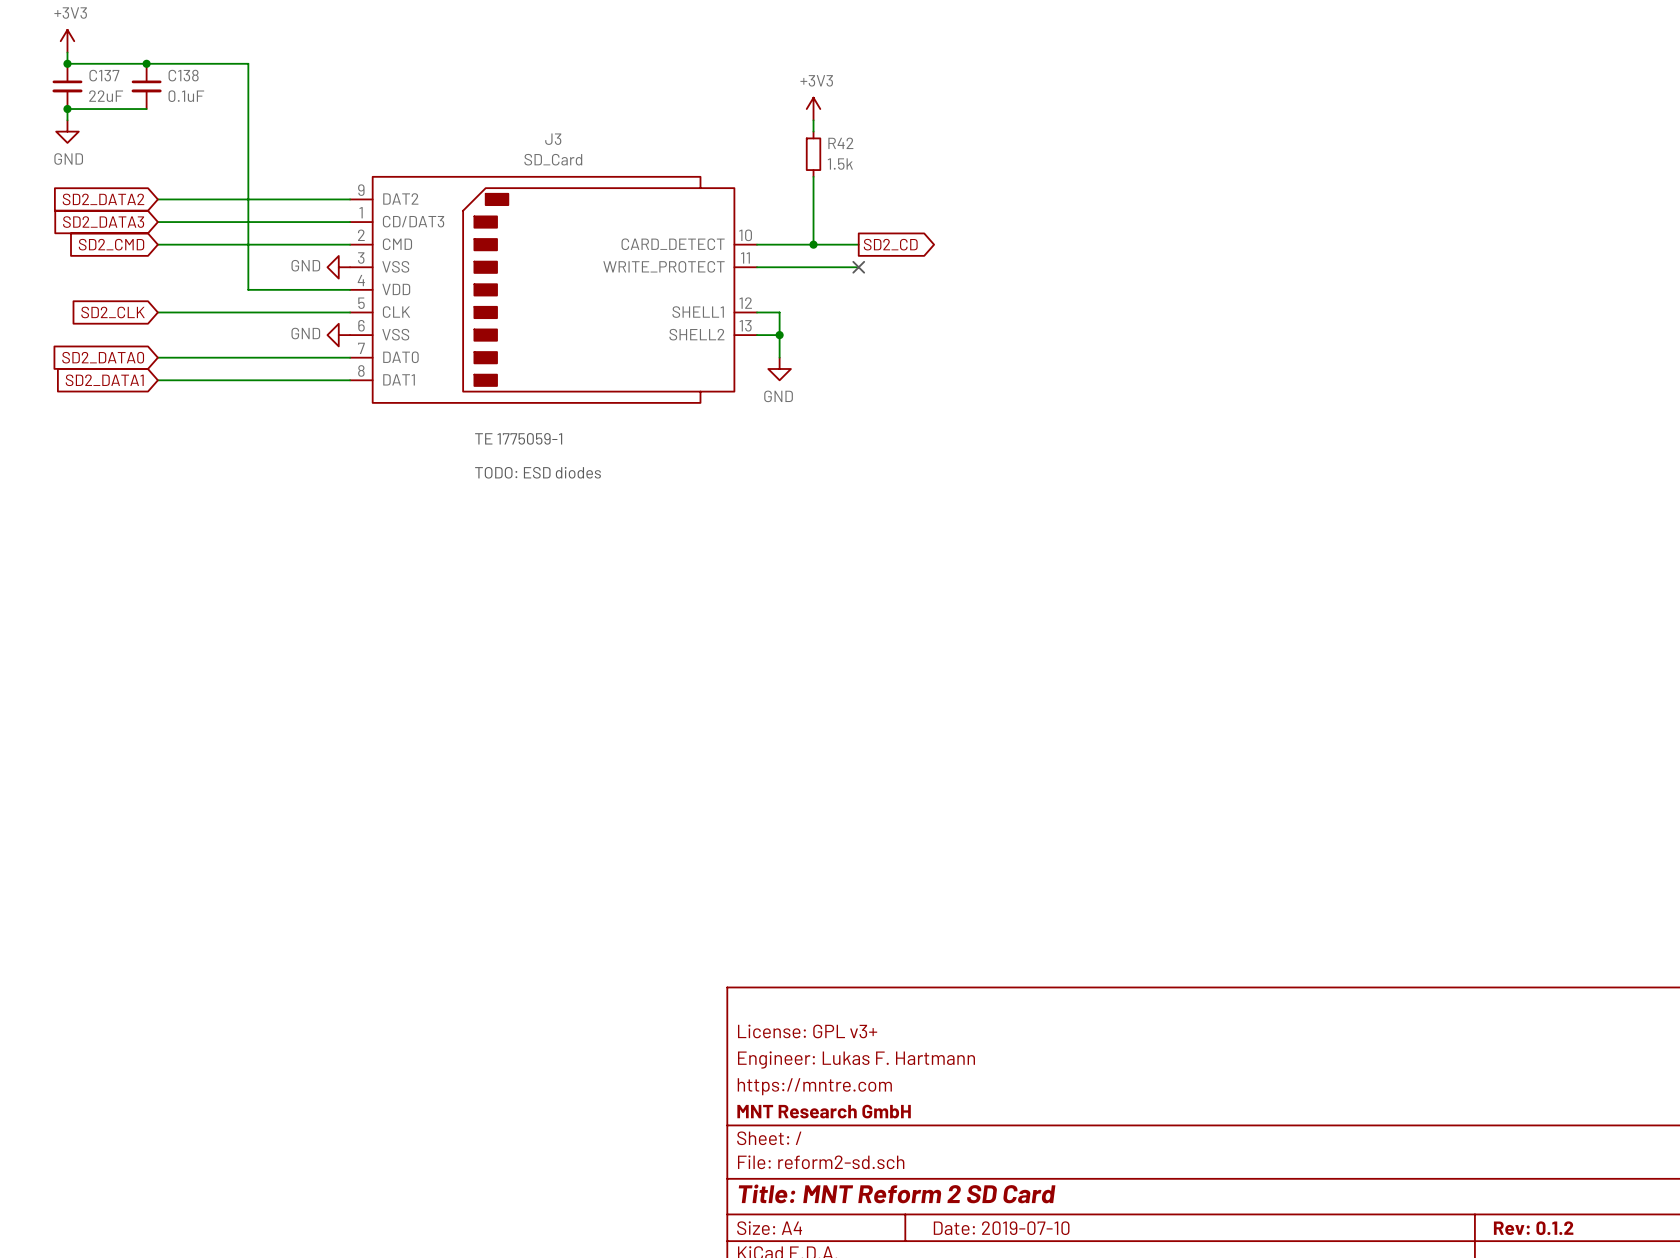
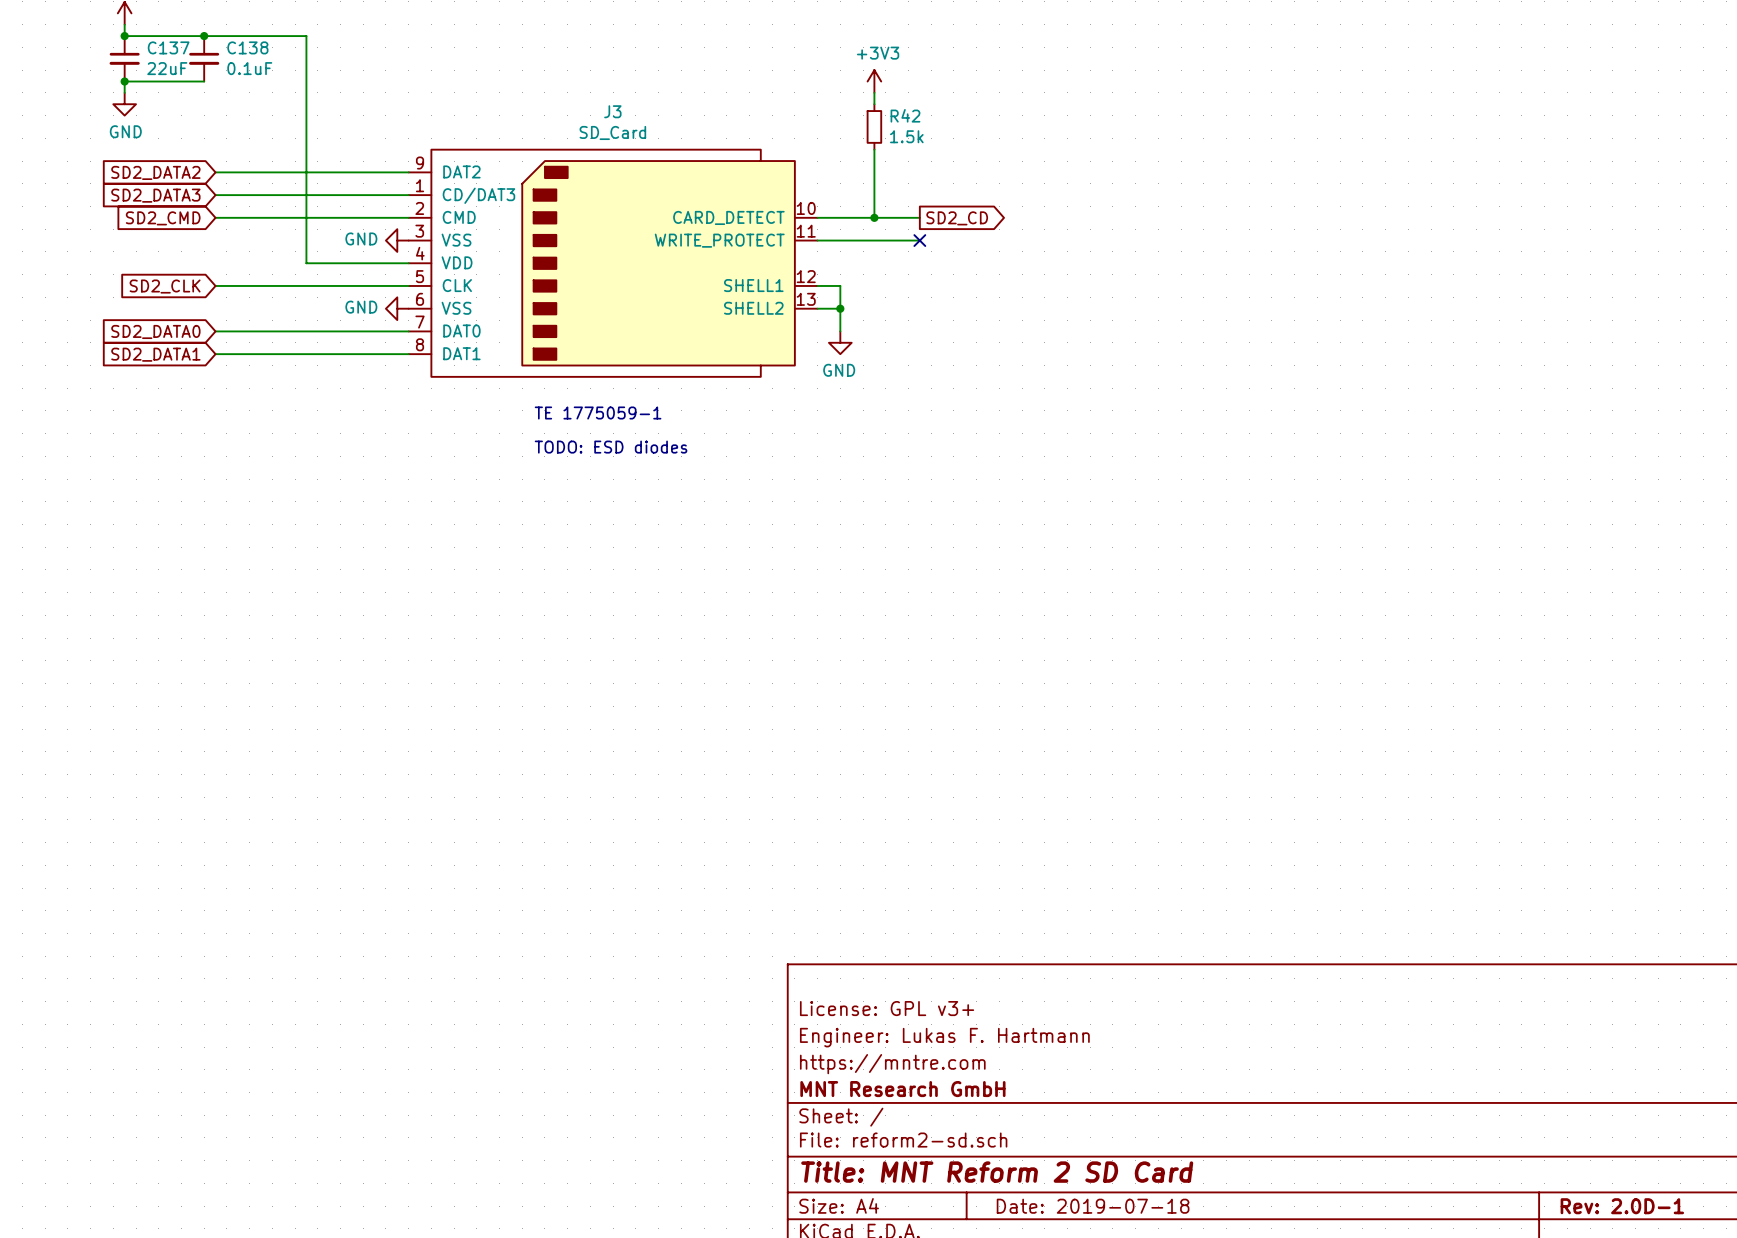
title block: Date: 2019-07-10 (1001, 1228) -> Date: 2019-07-18 (1093, 1206)
title block: Rev: 0.1.2 (1533, 1228) -> Rev: 2.0D-1 (1622, 1206)

